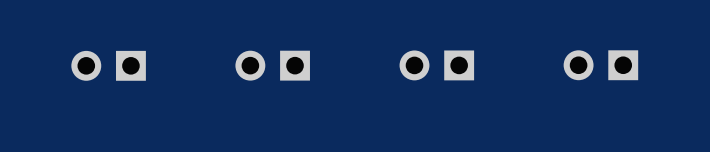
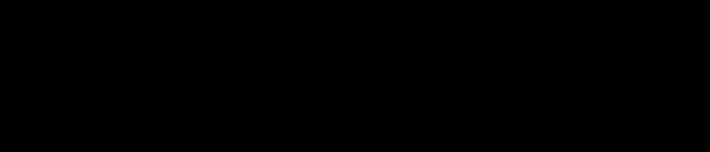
part: (108, 65) -> none
part: (272, 65) -> none
part: (436, 65) -> none
part: (600, 65) -> none

